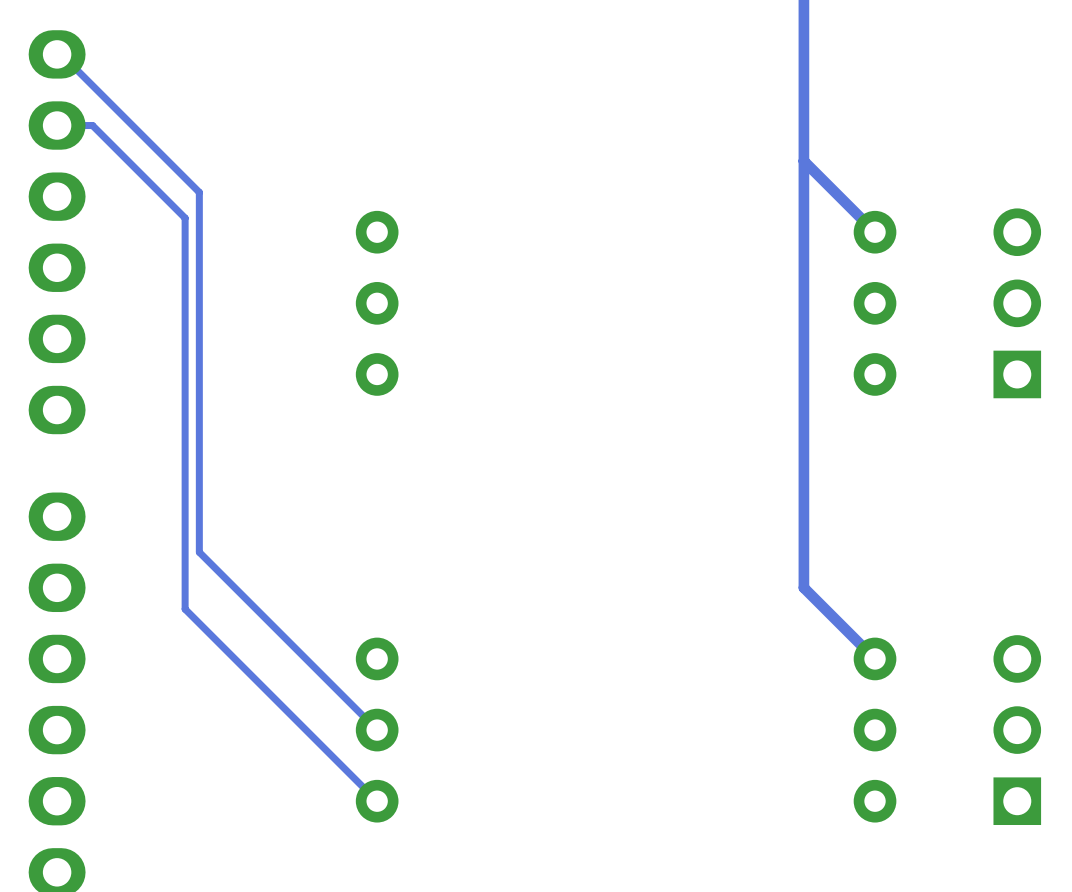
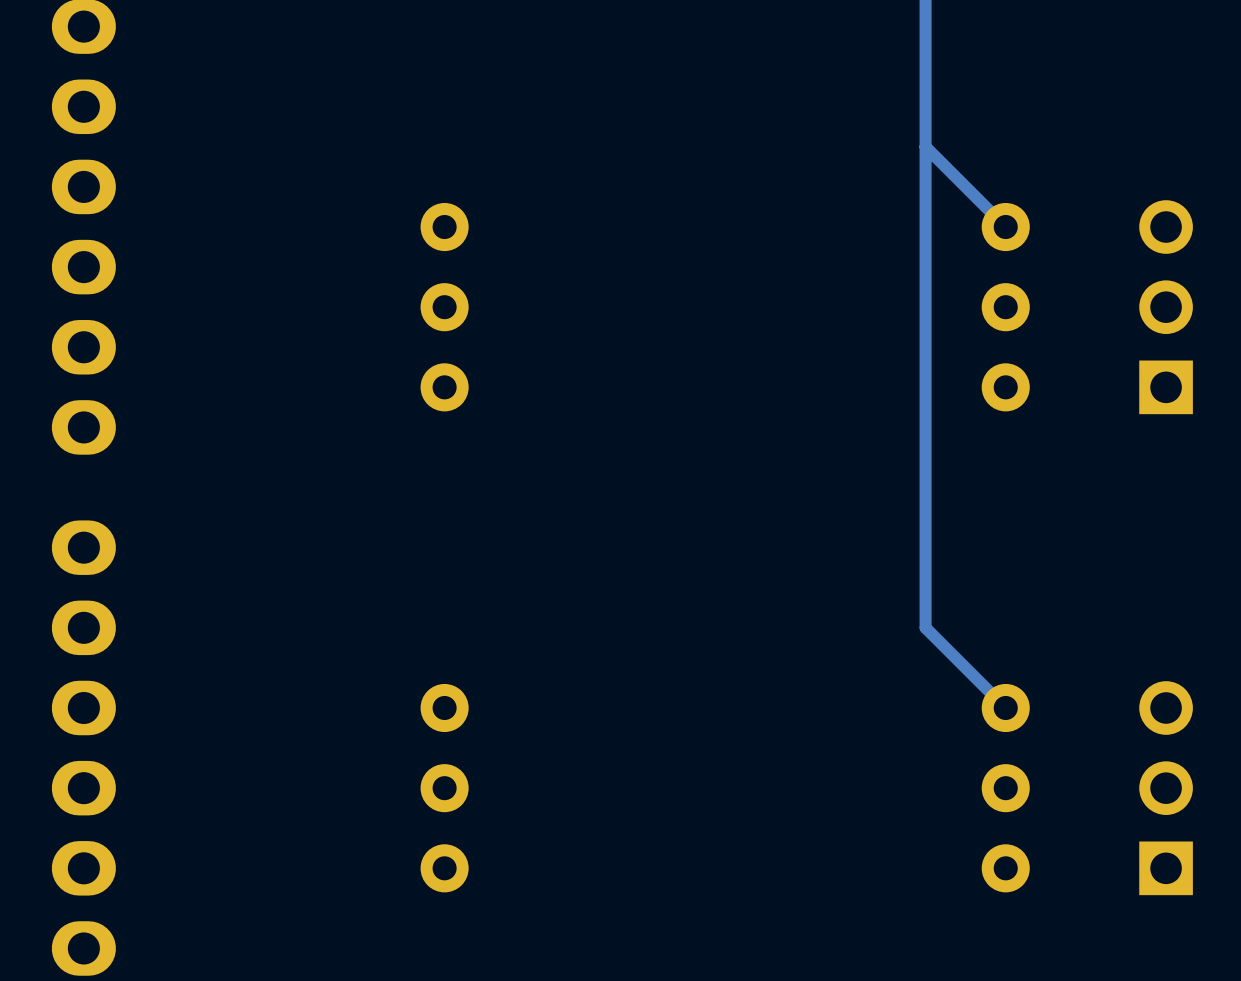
track: (57, 54) (61, 54) (199, 192) (199, 552) (377, 730) -> none
track: (57, 125) (92, 125) (185, 218) (185, 609) (377, 801) -> none

